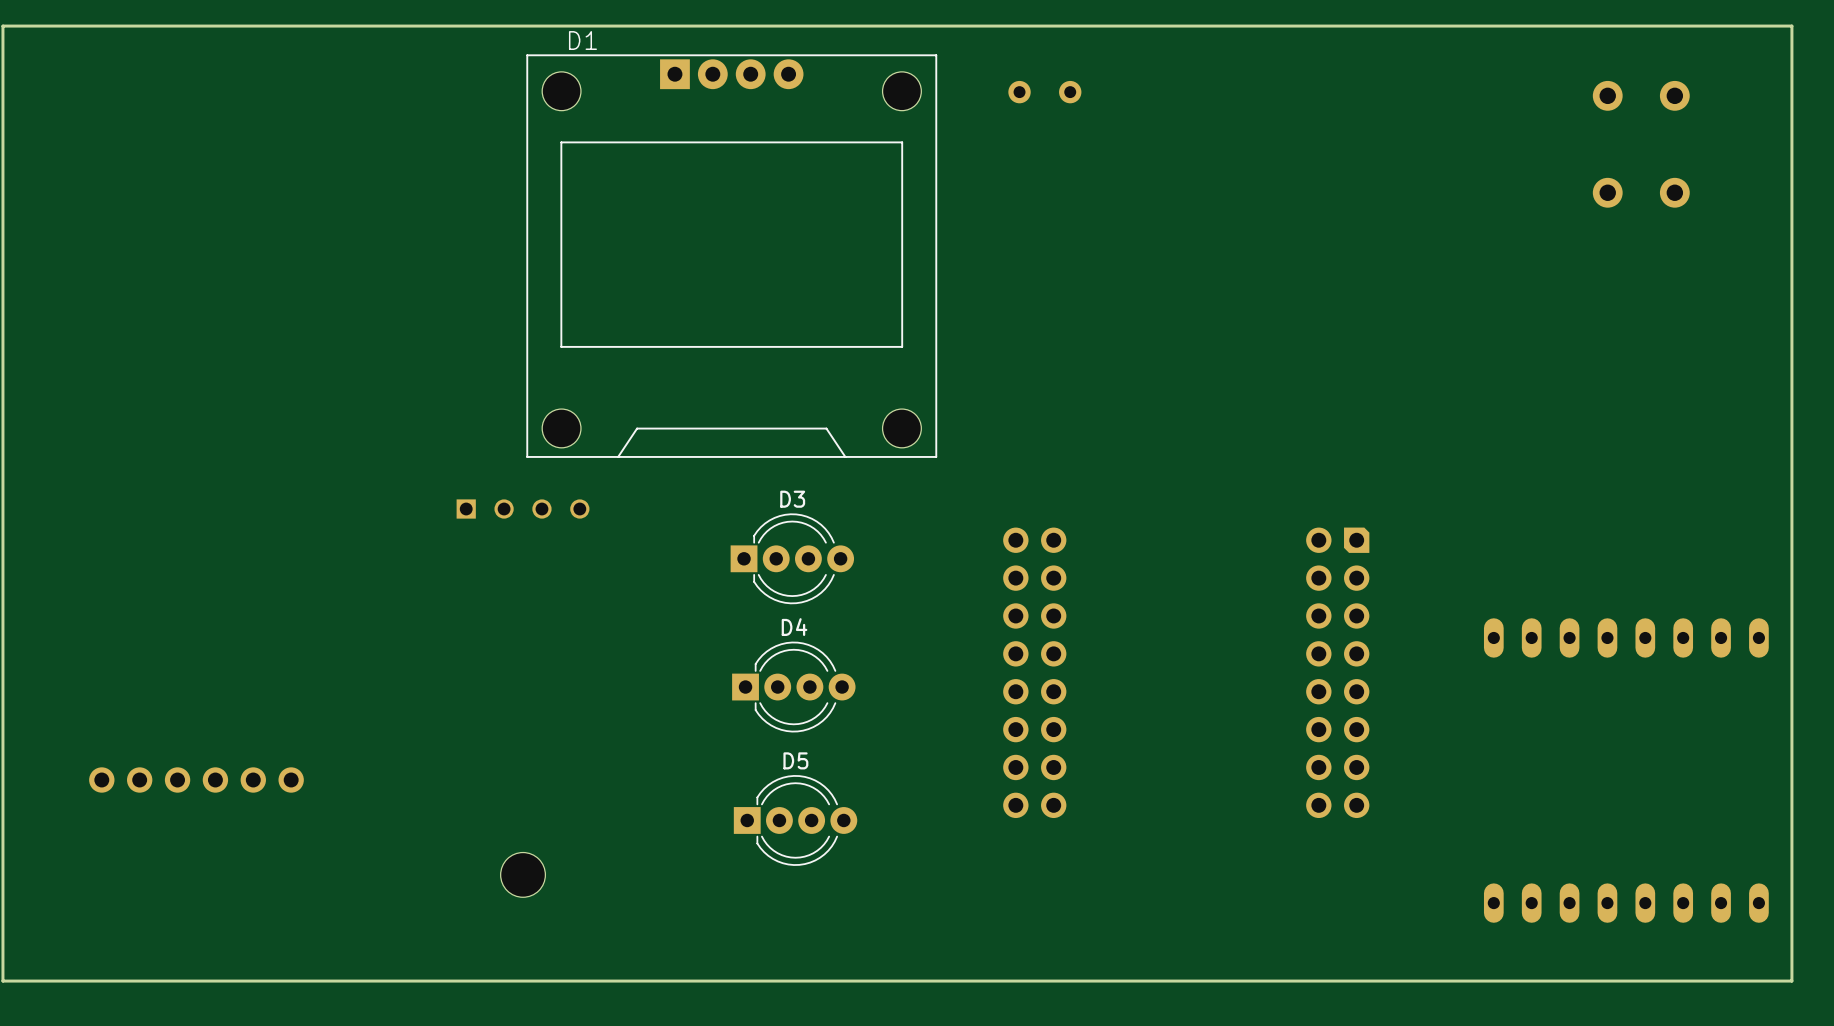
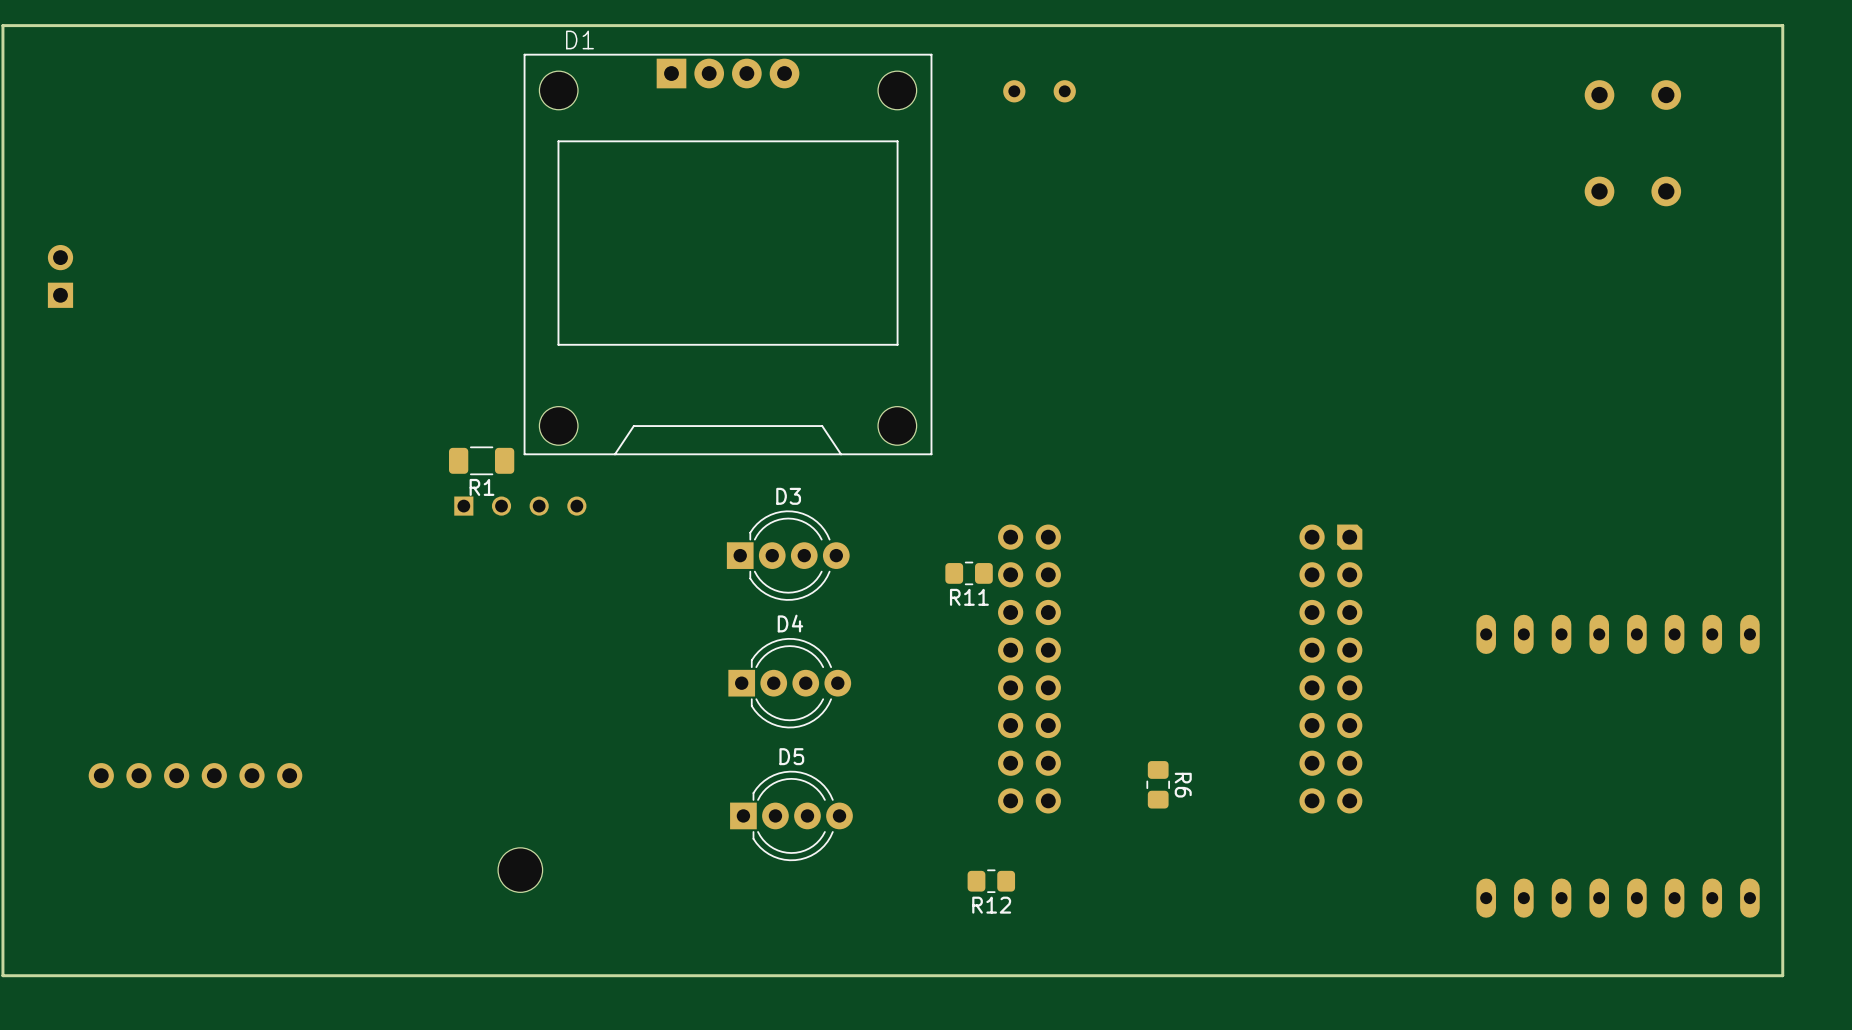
part: none -> (60, 276)
R1: none -> (481, 460)
R11: none -> (969, 573)
R6: none -> (1158, 784)
R12: none -> (991, 881)

